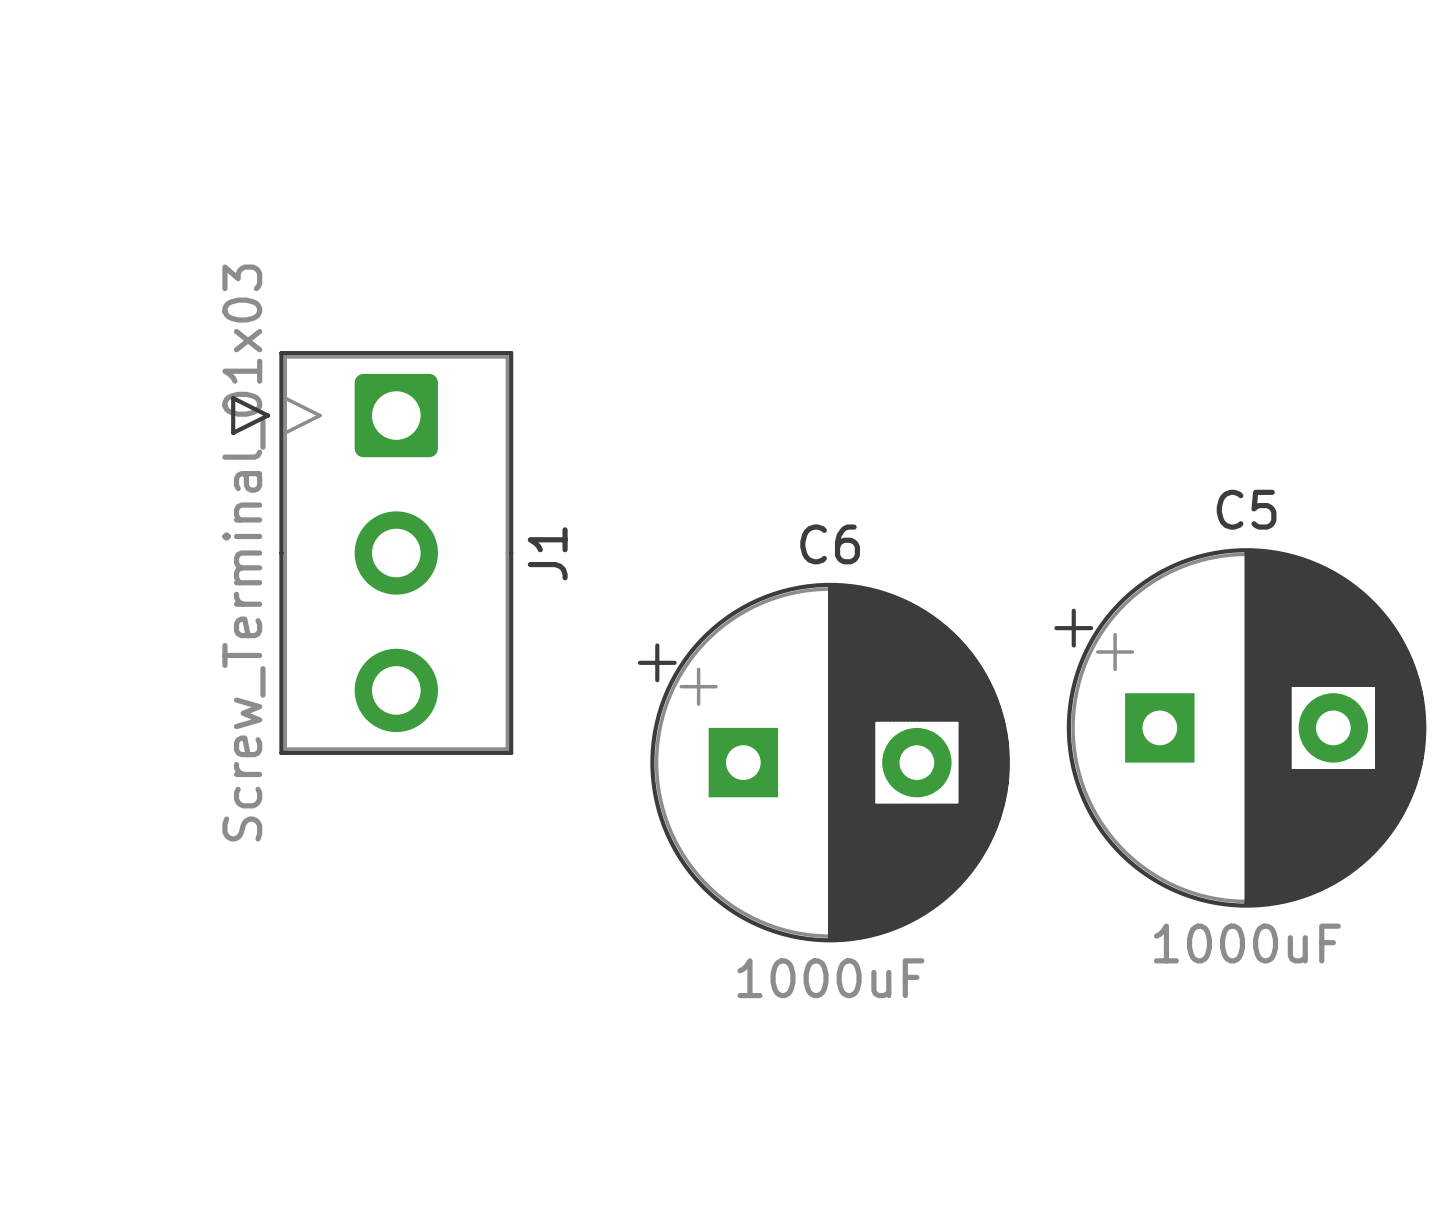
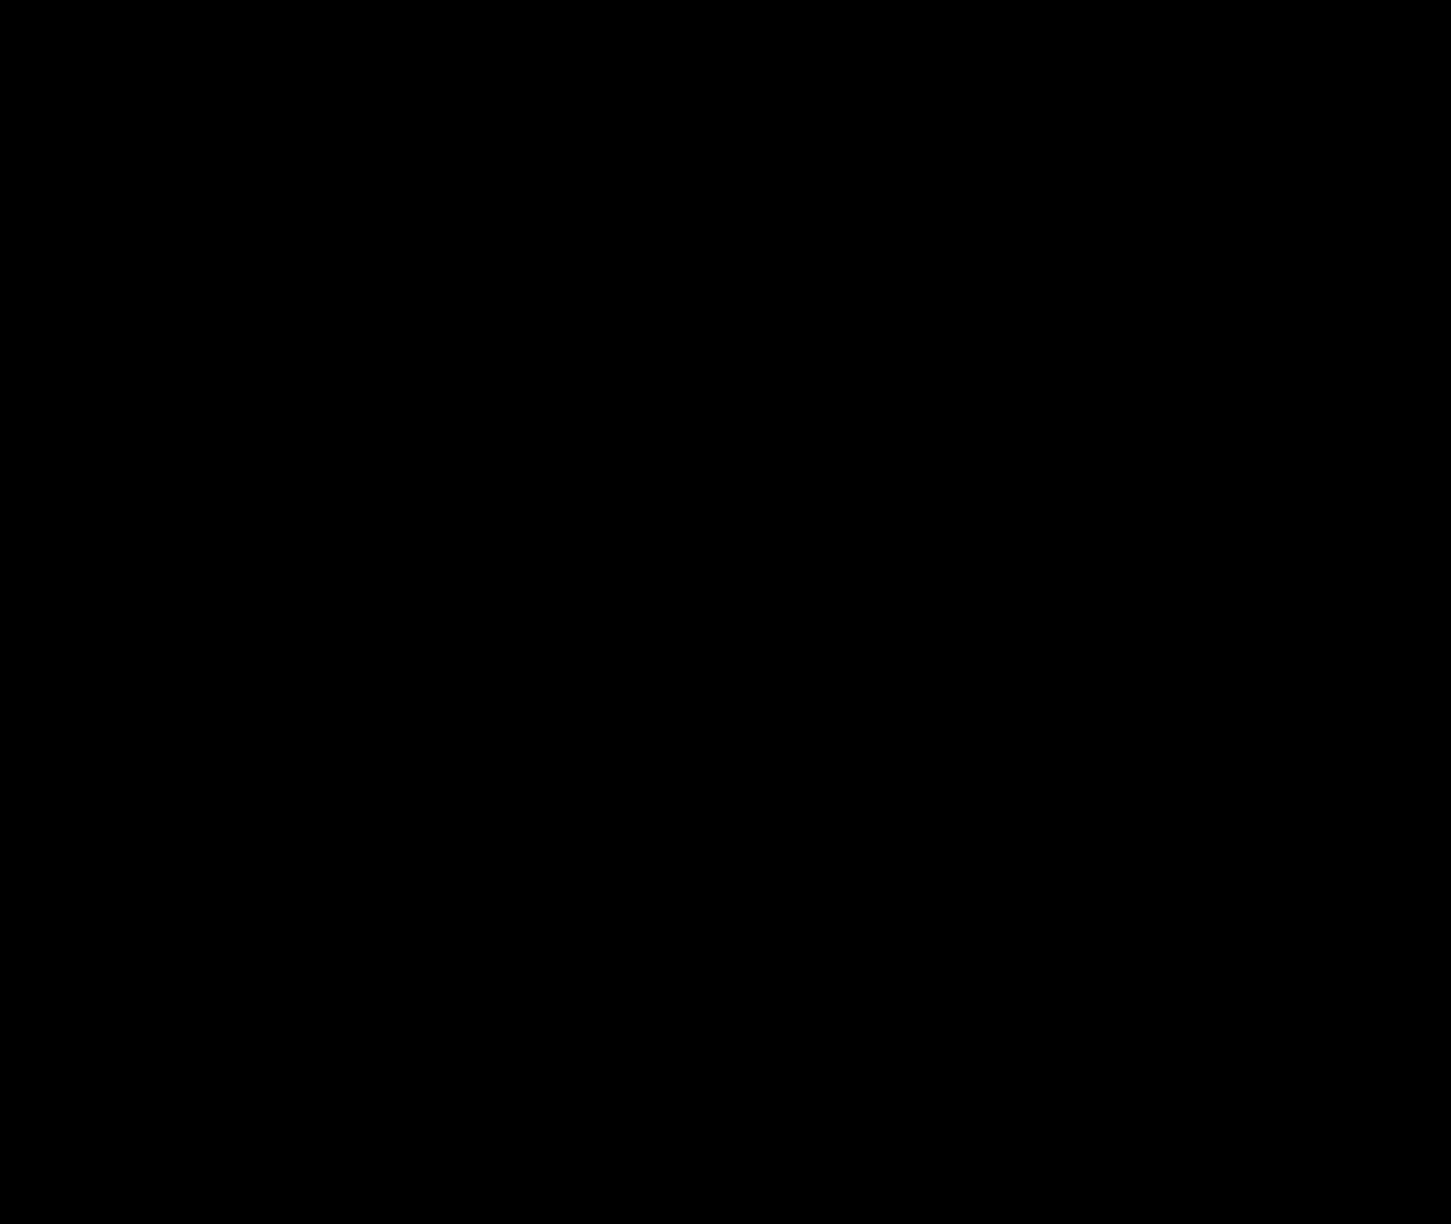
J1: Screw_Terminal_01x03 (372, 552) -> none
C5: 1000uF (1240, 727) -> none
C6: 1000uF (823, 762) -> none

